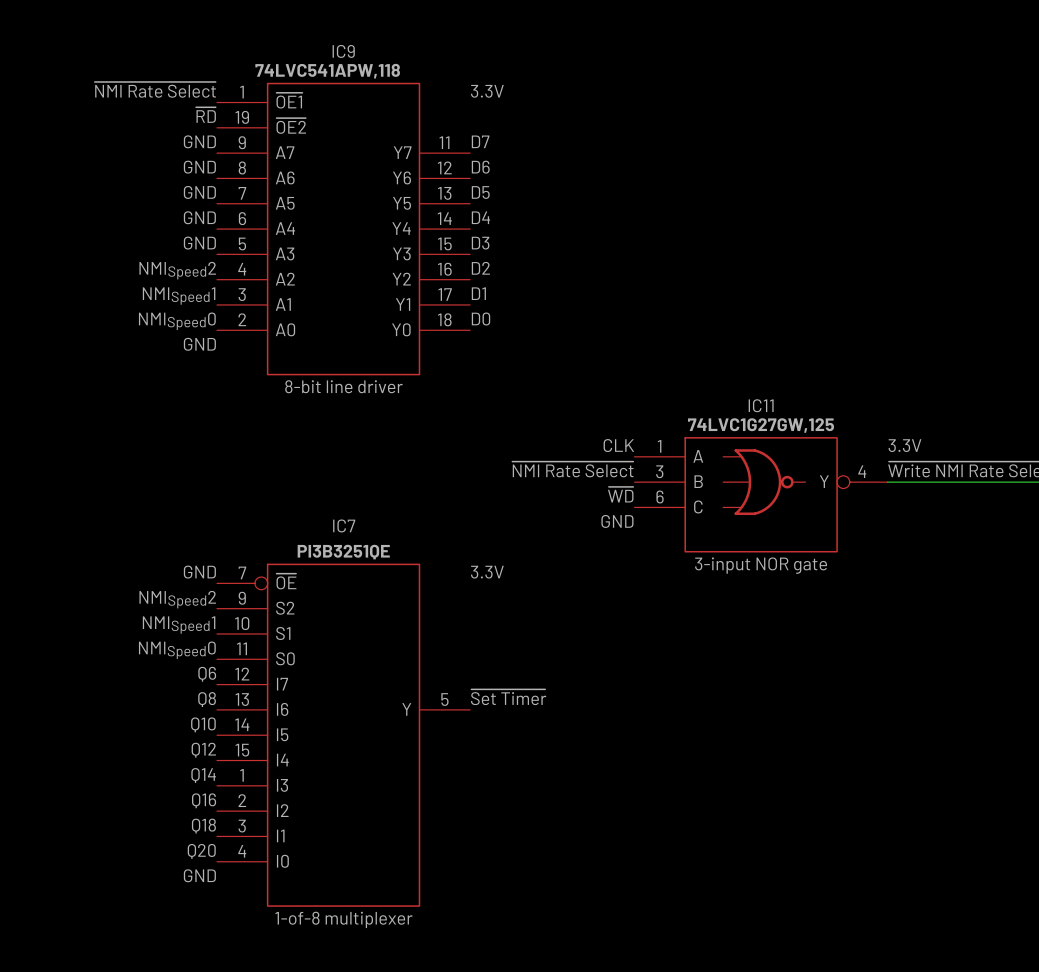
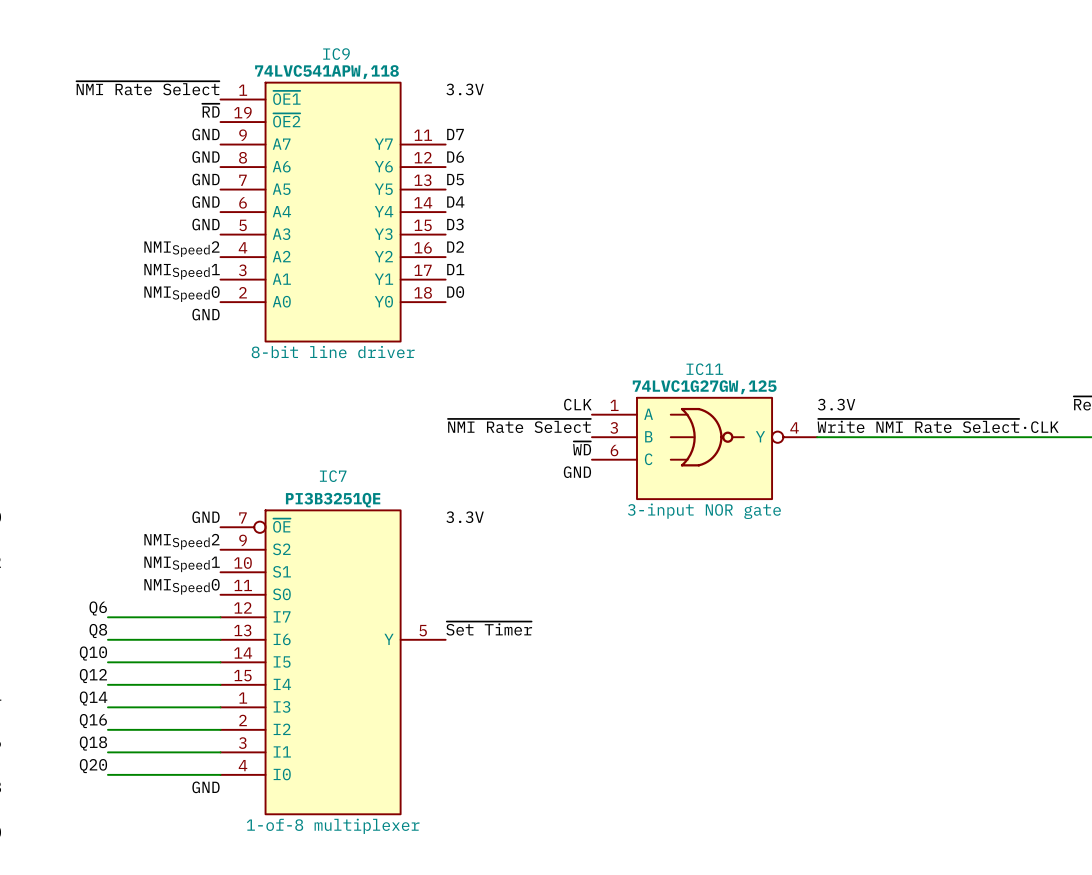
label position: Q6 (207, 674) -> Q6 (98, 608)
wire: none -> (107, 617) (220, 617)
label position: Q8 (207, 699) -> Q8 (98, 630)
wire: none -> (107, 639) (220, 639)
label position: Q10 (203, 724) -> Q10 (93, 653)
wire: none -> (107, 662) (220, 662)
label position: Q12 (203, 750) -> Q12 (93, 676)
wire: none -> (107, 684) (220, 684)
label position: Q14 (203, 775) -> Q14 (93, 698)
wire: none -> (107, 707) (220, 707)
label position: Q16 (204, 800) -> Q16 (93, 721)
wire: none -> (107, 729) (220, 729)
label position: Q18 (203, 826) -> Q18 (93, 743)
wire: none -> (107, 752) (220, 752)
label position: Q20 (201, 851) -> Q20 (93, 766)
wire: none -> (107, 774) (220, 774)

